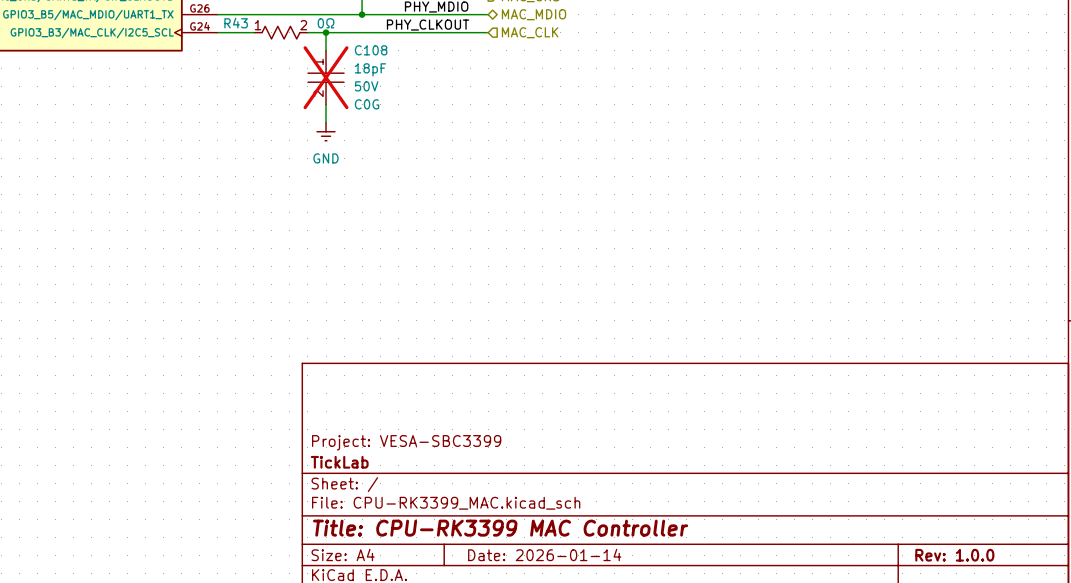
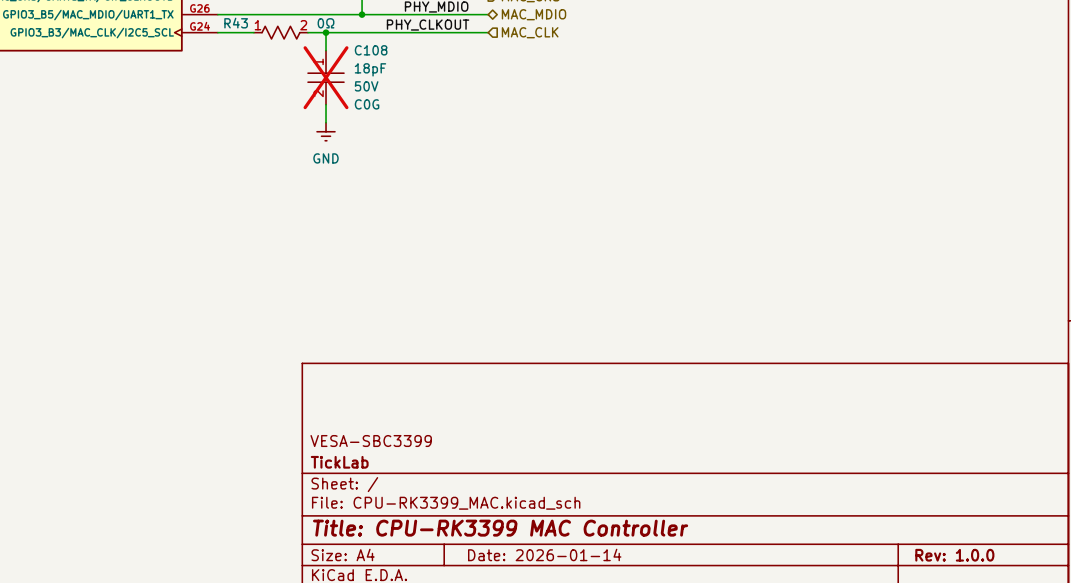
title block: Project: VESA-SBC3399 (406, 442) -> VESA-SBC3399 (371, 441)

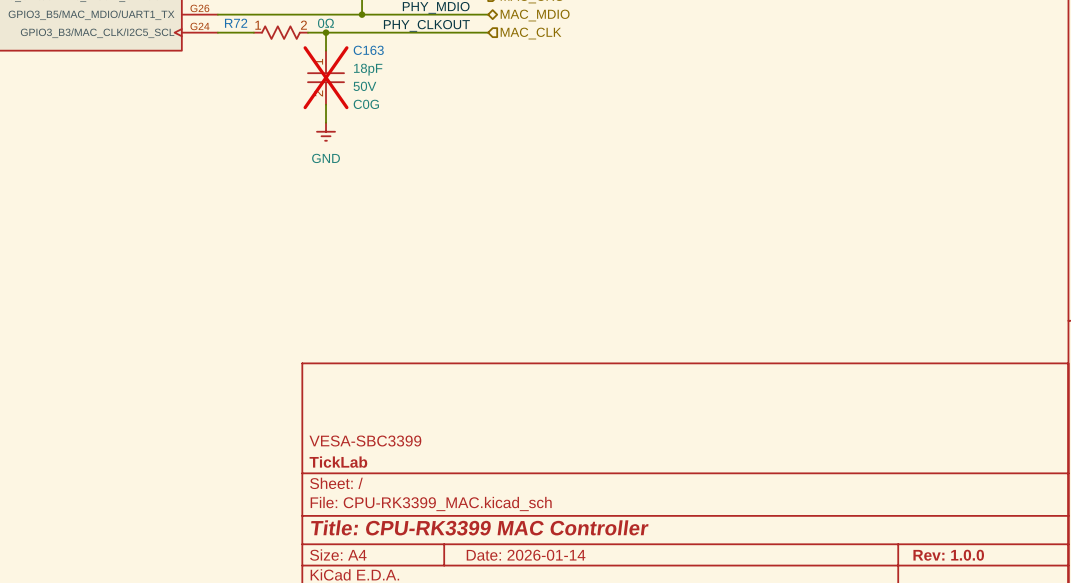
R43 name: R43 (236, 23) -> R72 (236, 23)
C108 name: C108 (371, 50) -> C163 (368, 50)

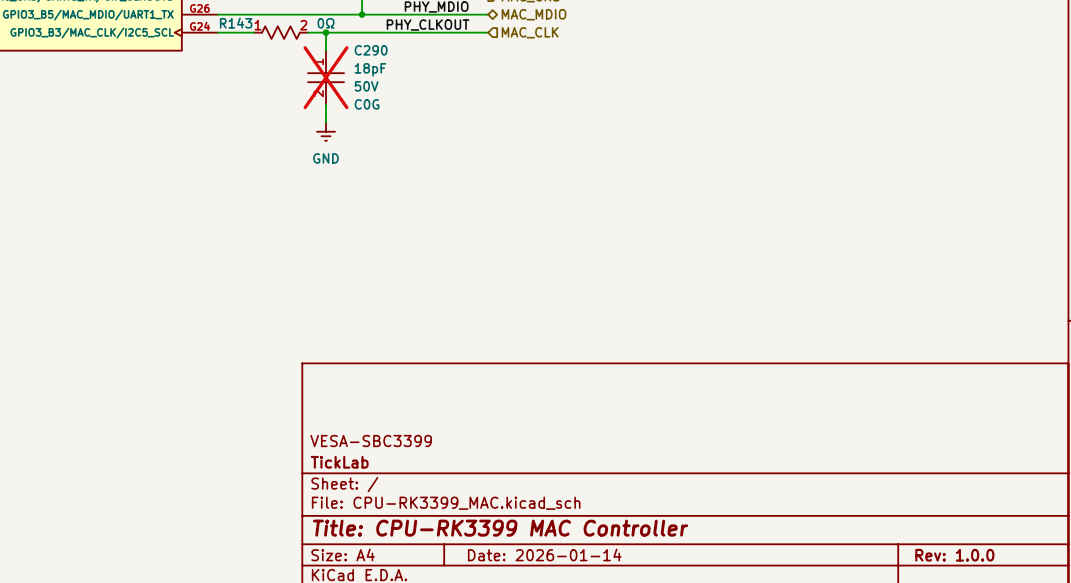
R72 name: R72 (236, 23) -> R143 (236, 23)
C163 name: C163 (368, 50) -> C290 (371, 50)

